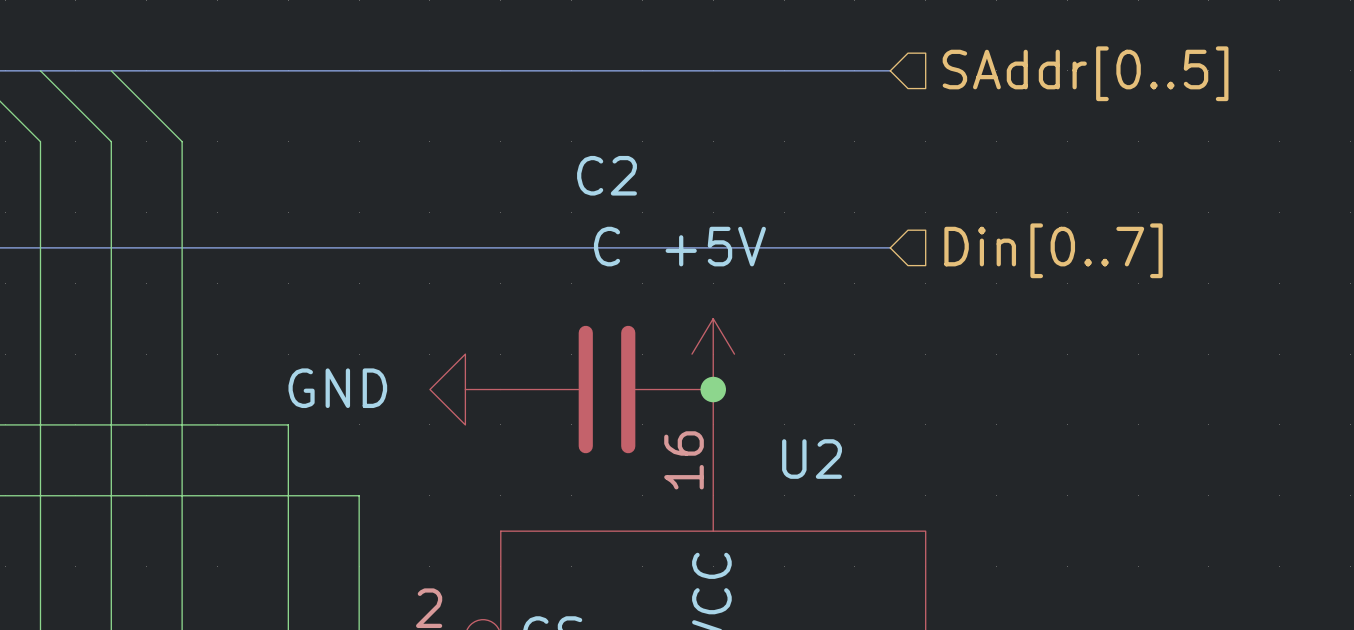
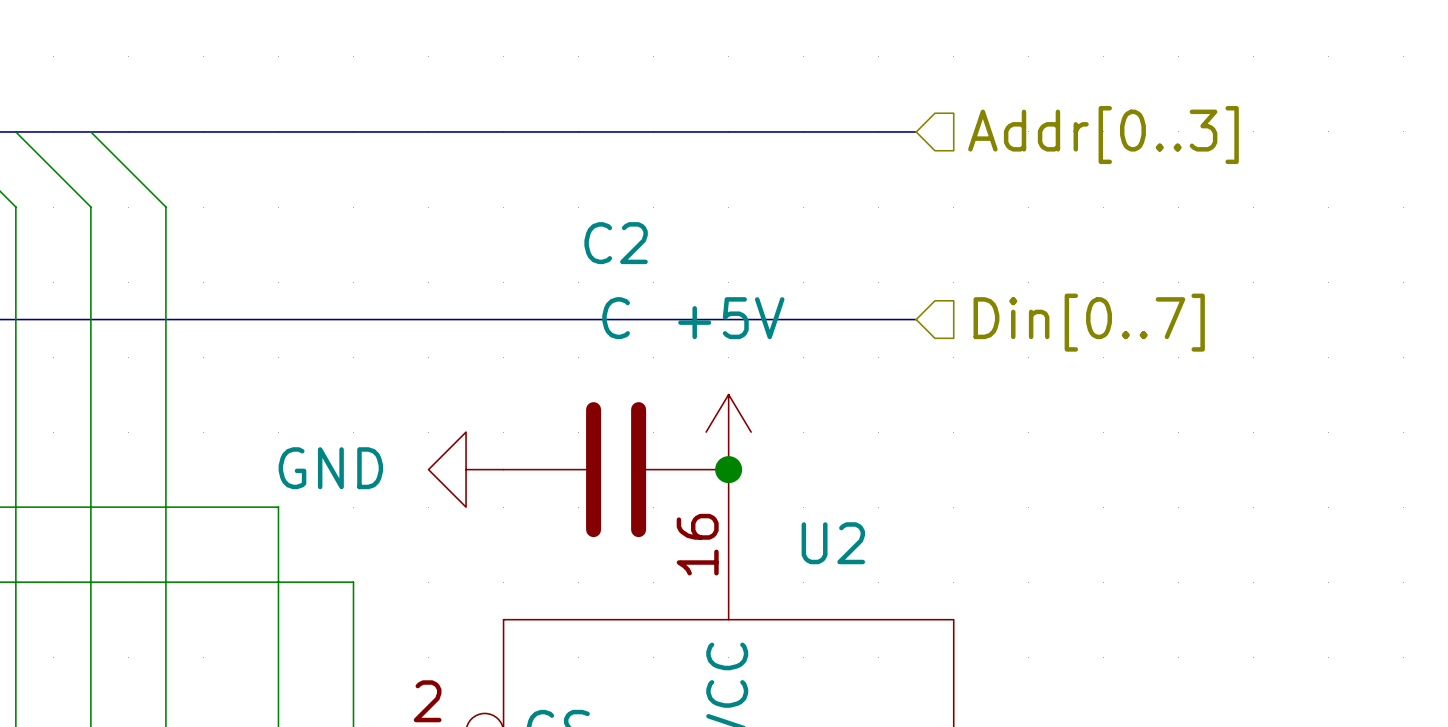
hierarchical label: SAddr[0..5] (1085, 73) -> Addr[0..3] (1103, 135)

